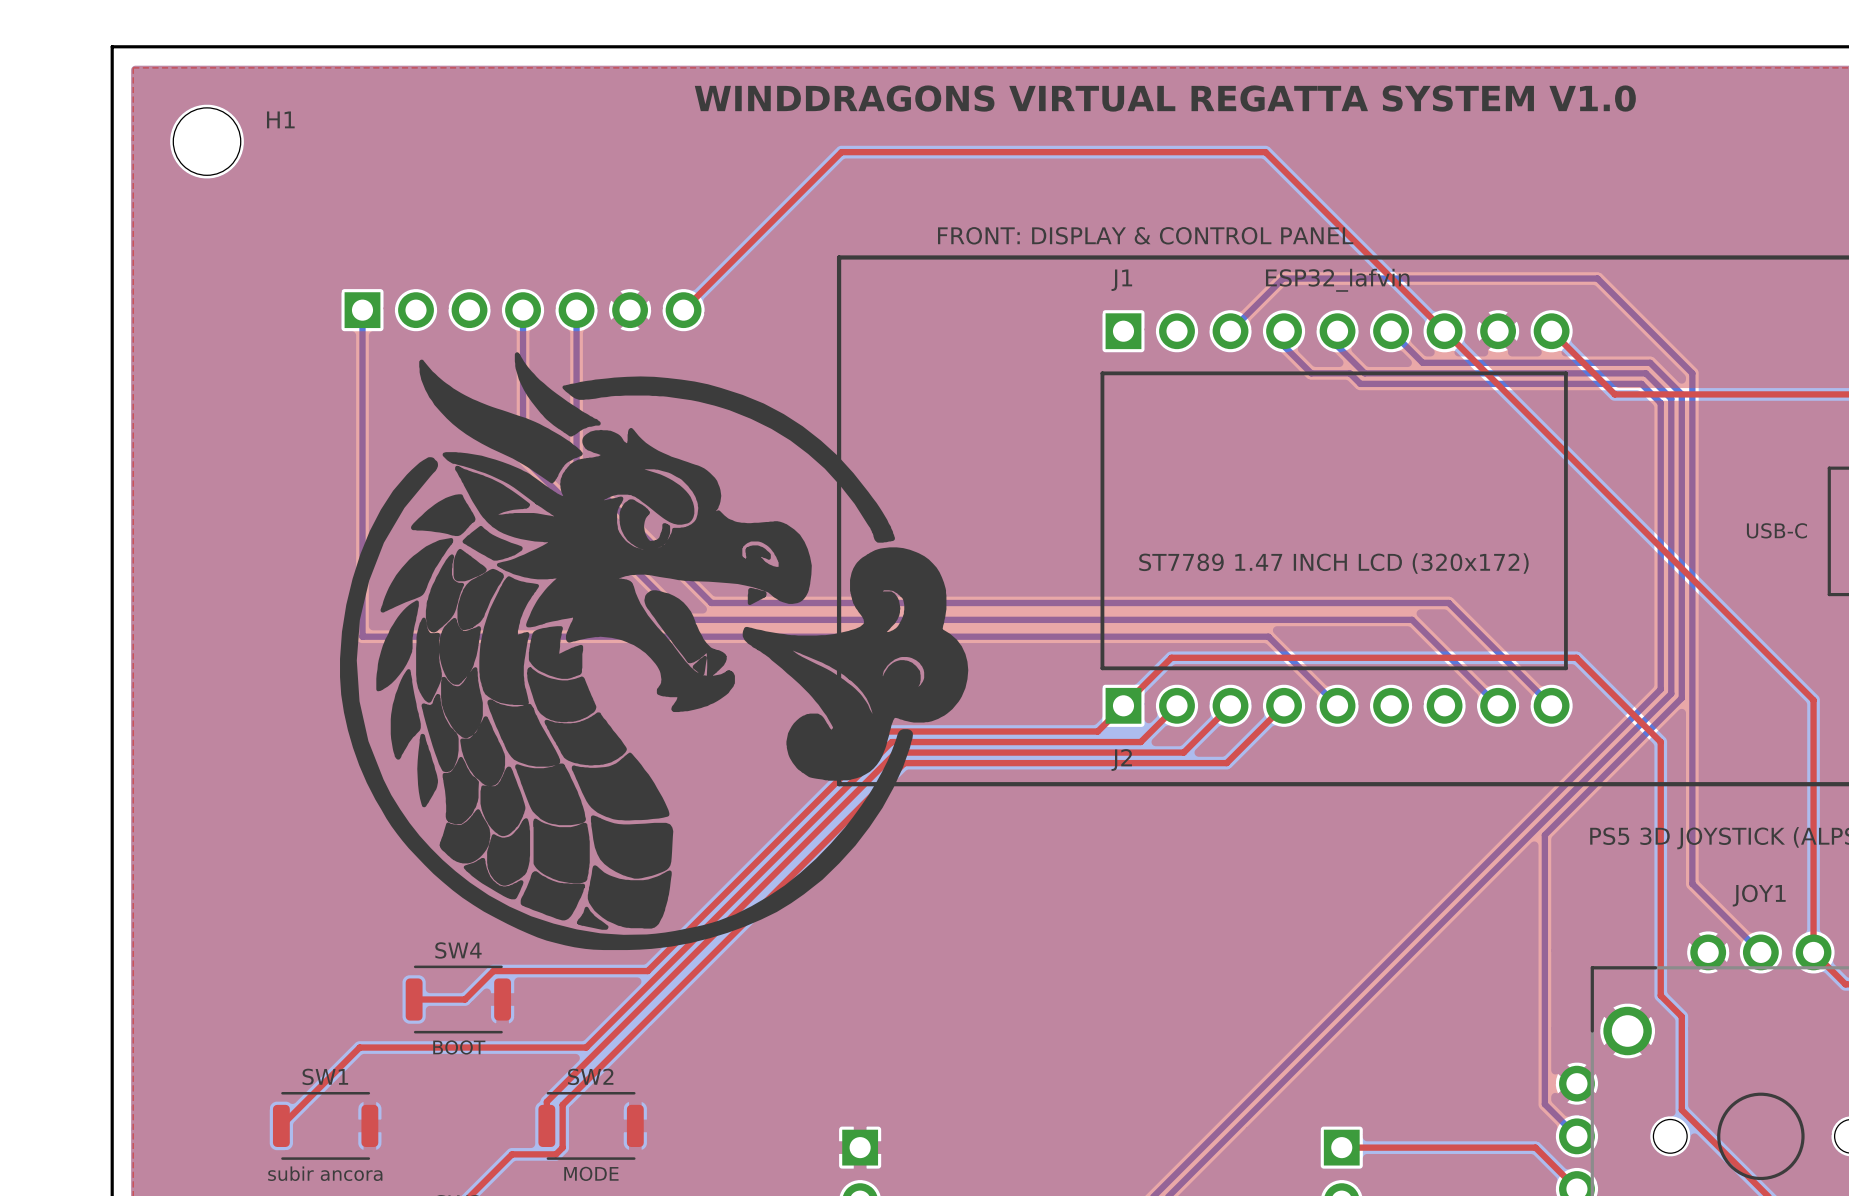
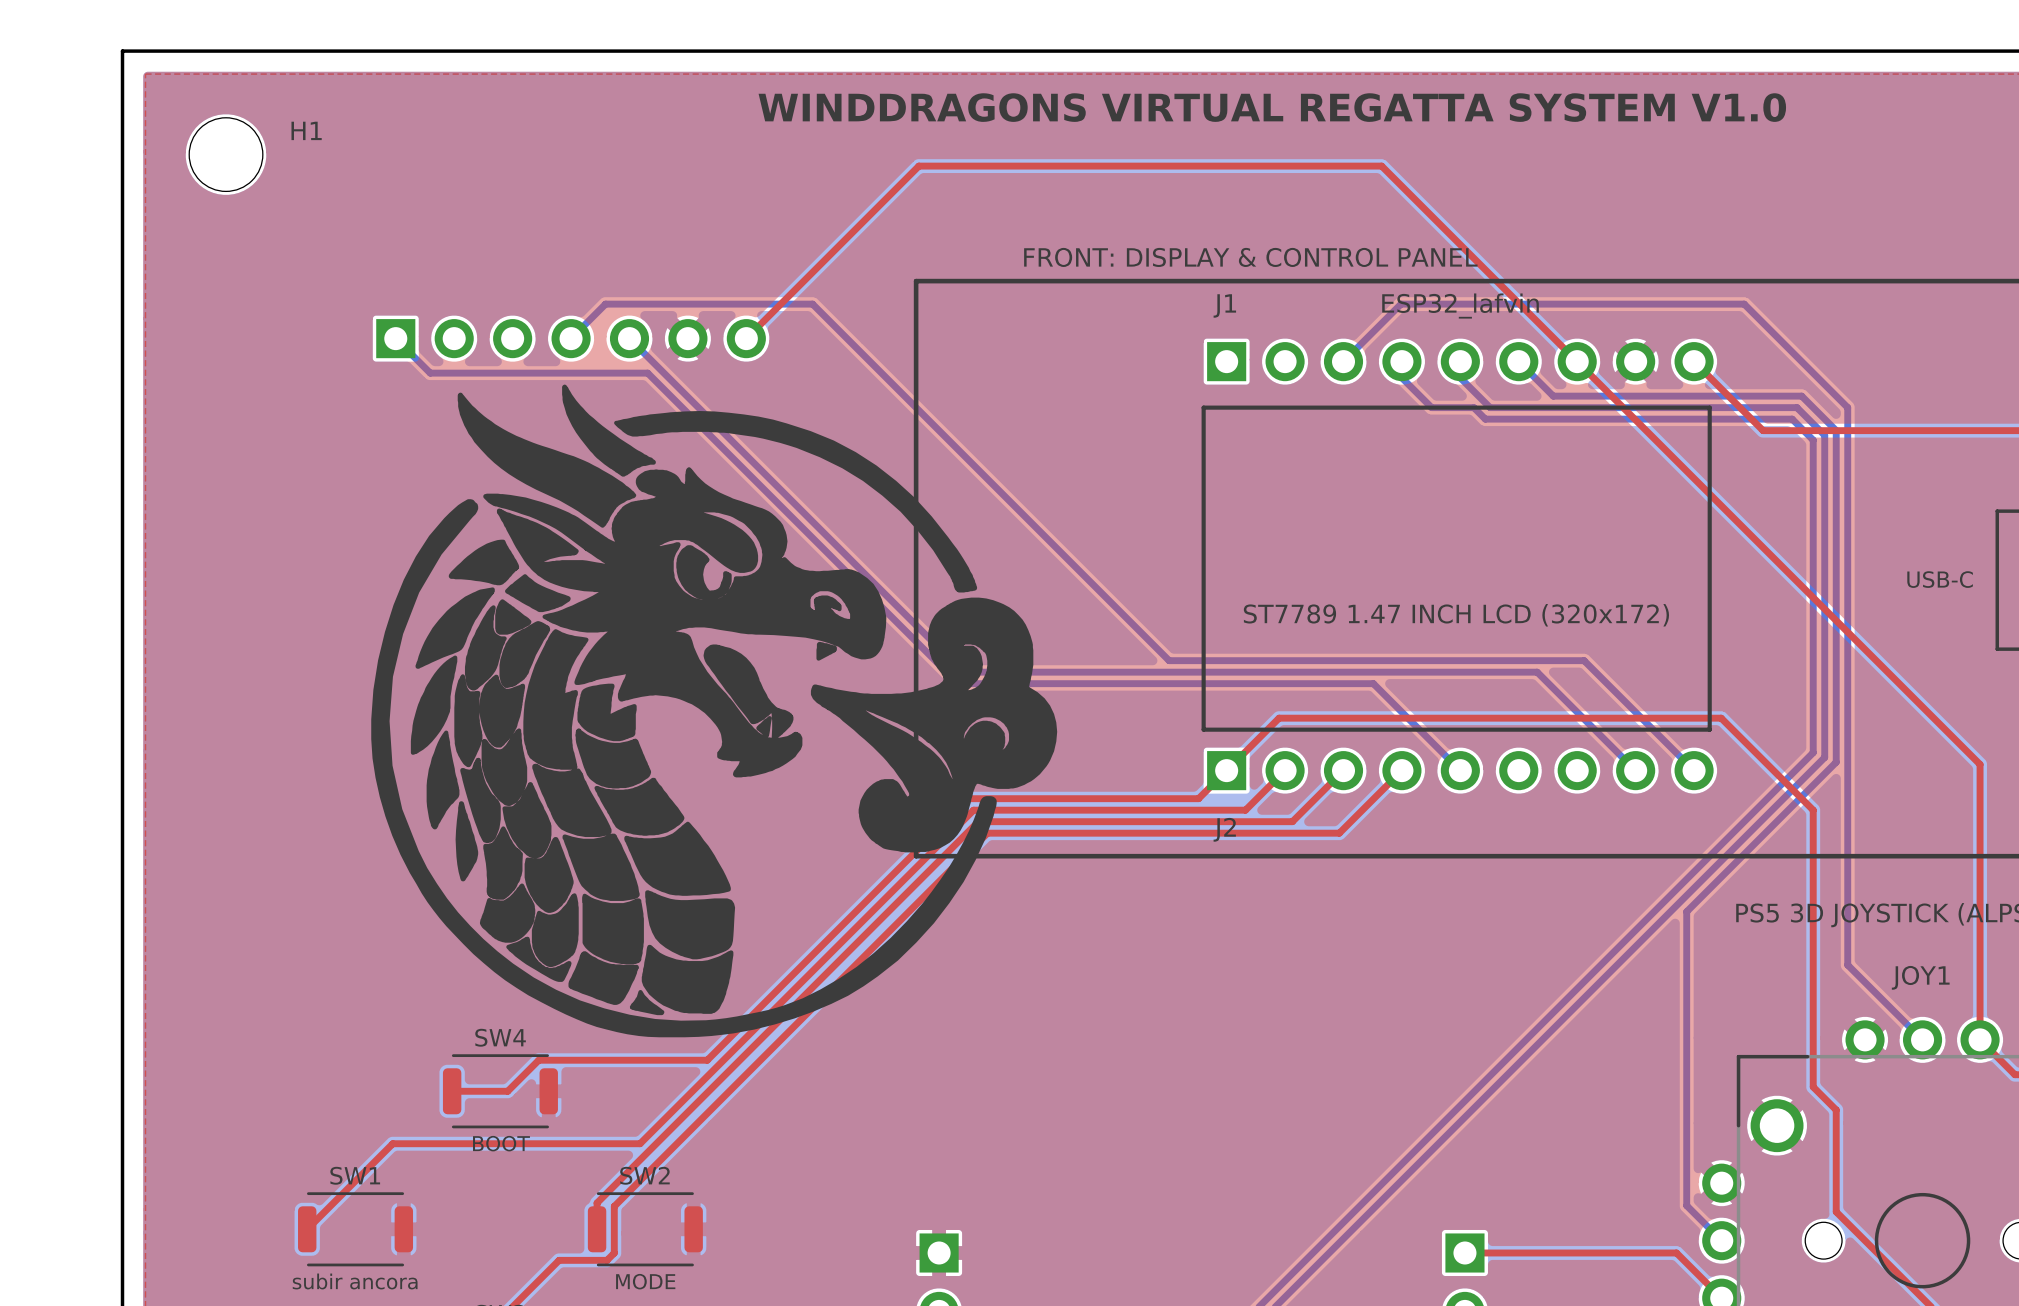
bottom track: (362, 310) (362, 636) (1268, 636) -> (395, 338) (430, 373) (647, 373) (958, 683) (1373, 683) (1384, 695)
bottom track: (523, 310) (523, 457) (685, 619) (1412, 619) -> (571, 338) (605, 304) (812, 304) (1169, 660) (1584, 660)
bottom track: (576, 310) (576, 468) (711, 603) (1448, 603) (1450, 605) -> (629, 338) (963, 672) (1537, 672) (1541, 676)

